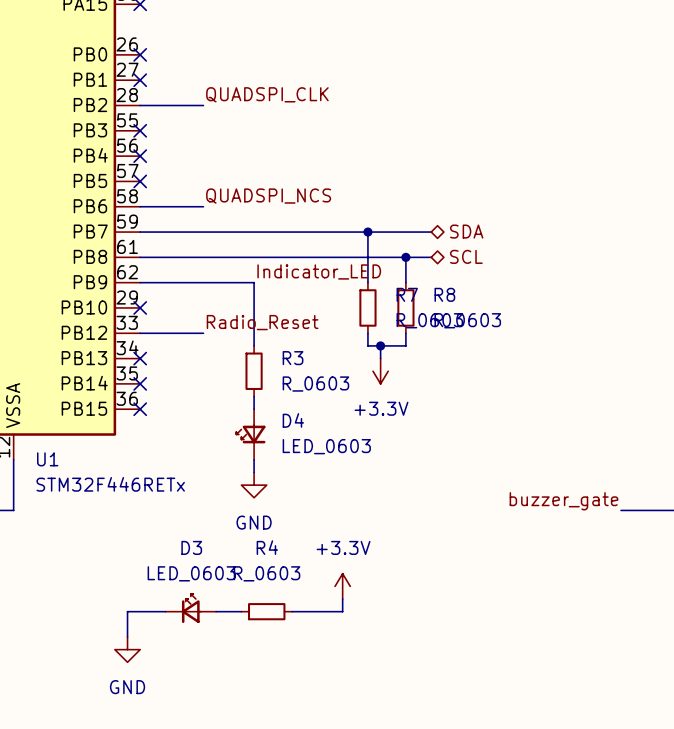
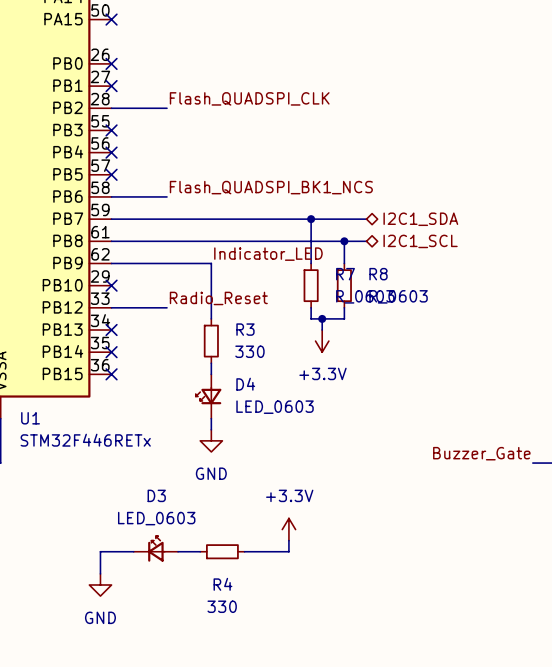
label: QUADSPI_CLK (267, 94) -> Flash_QUADSPI_CLK (249, 98)
label: QUADSPI_NCS (268, 196) -> Flash_QUADSPI_BK1_NCS (271, 187)
hierarchical label: SDA (466, 231) -> I2C1_SDA (420, 219)
hierarchical label: SCL (466, 256) -> I2C1_SCL (420, 241)
R3 value: R_0603 (315, 384) -> 330 (249, 351)
label: buzzer_gate (564, 501) -> Buzzer_Gate (481, 453)
R4 name position: R4 (267, 547) -> R4 (222, 584)
R4 value: R_0603 (267, 573) -> 330 (222, 606)

